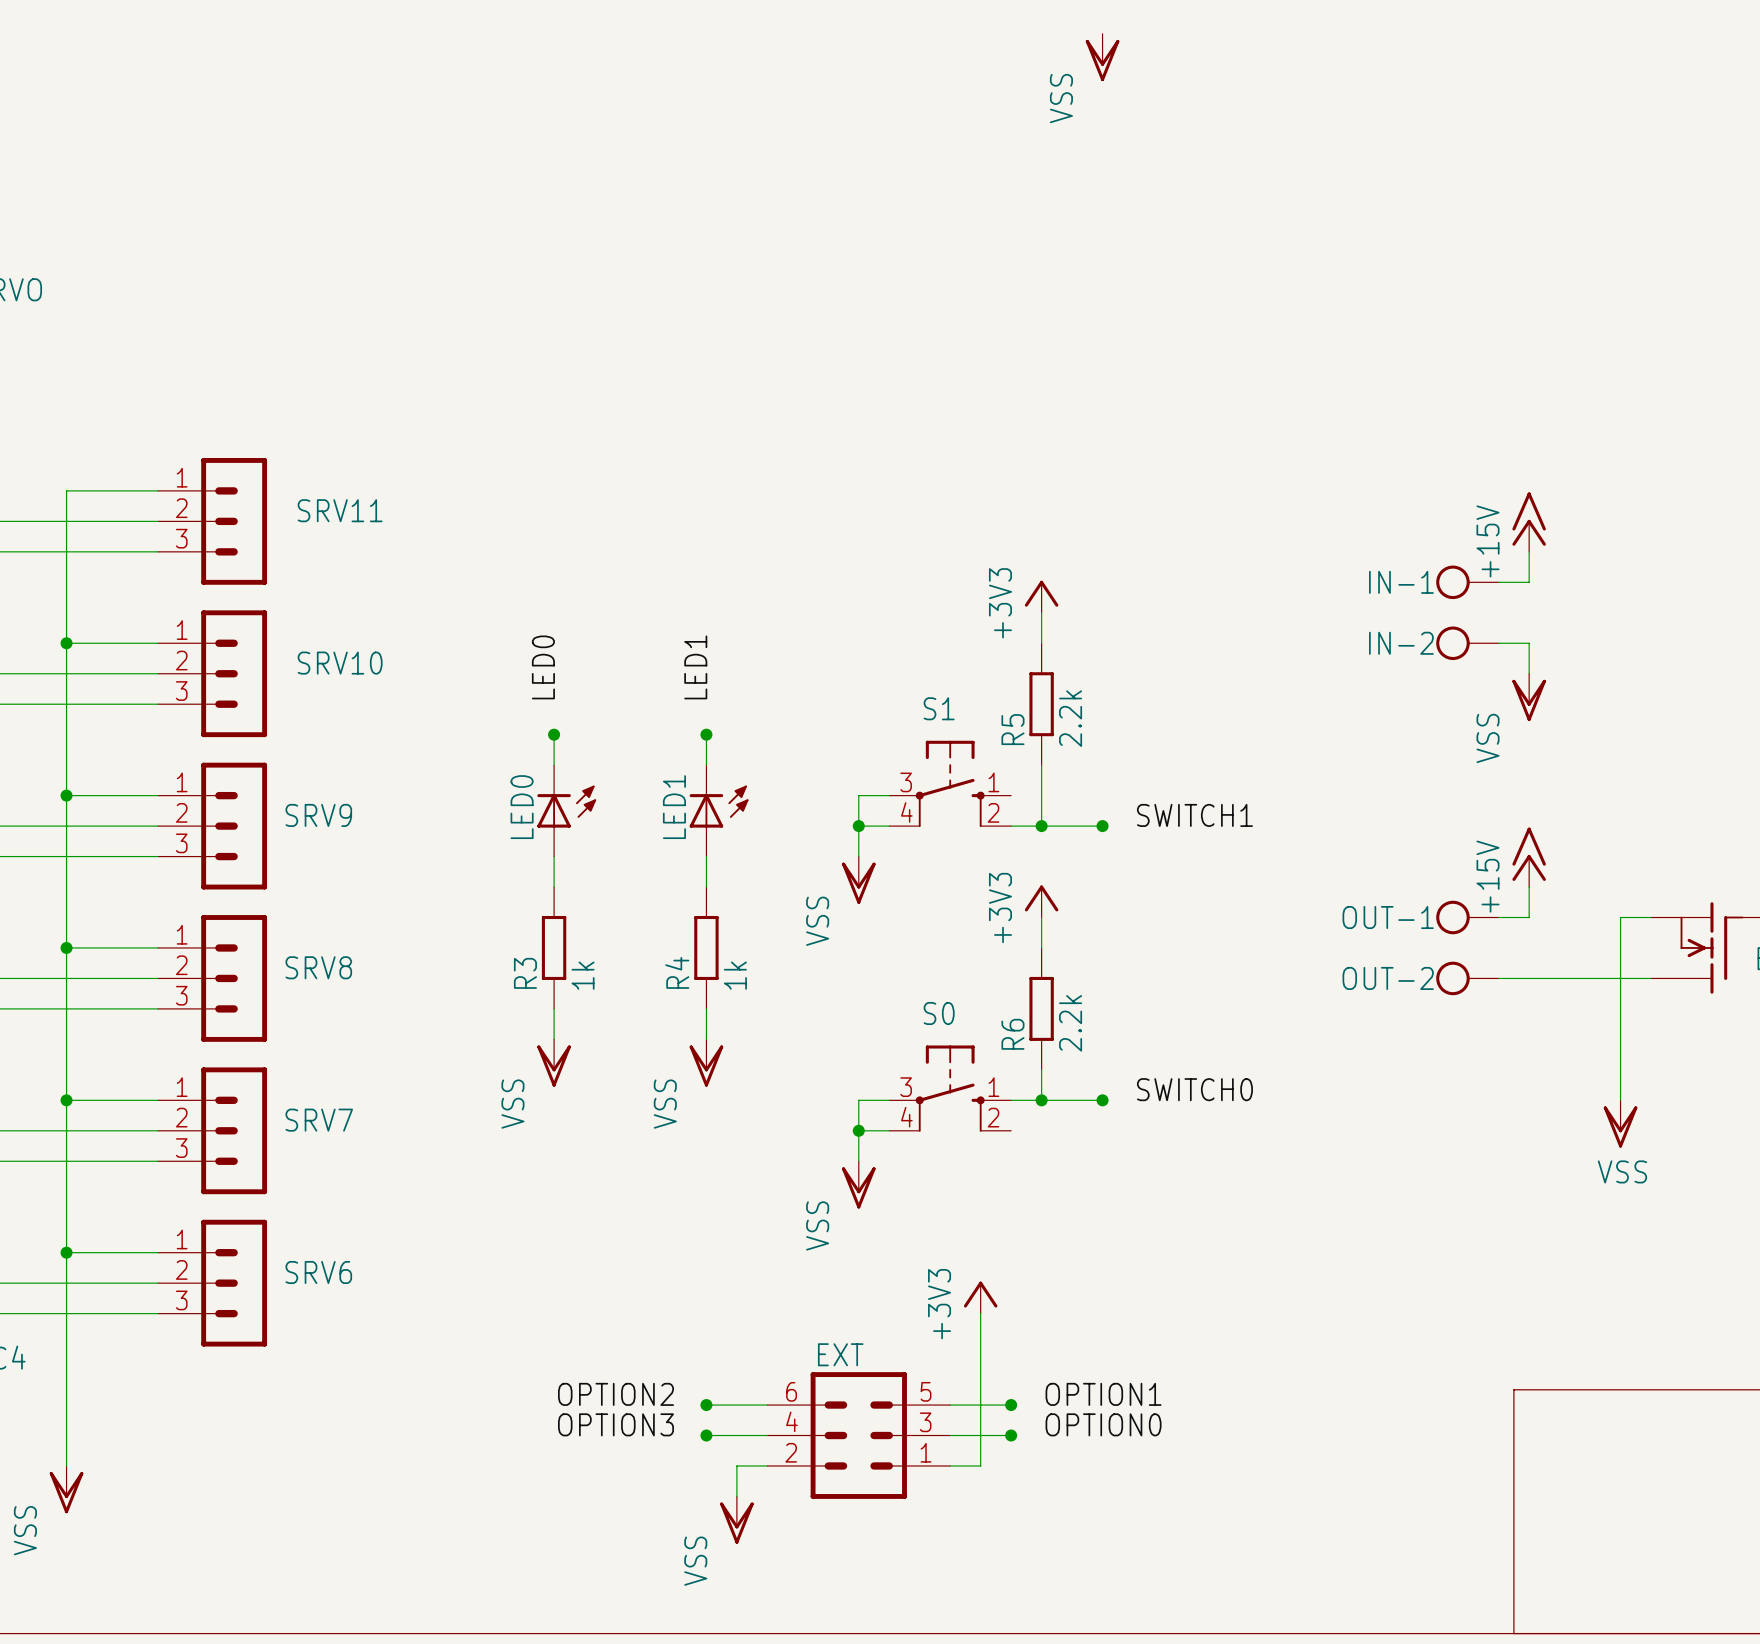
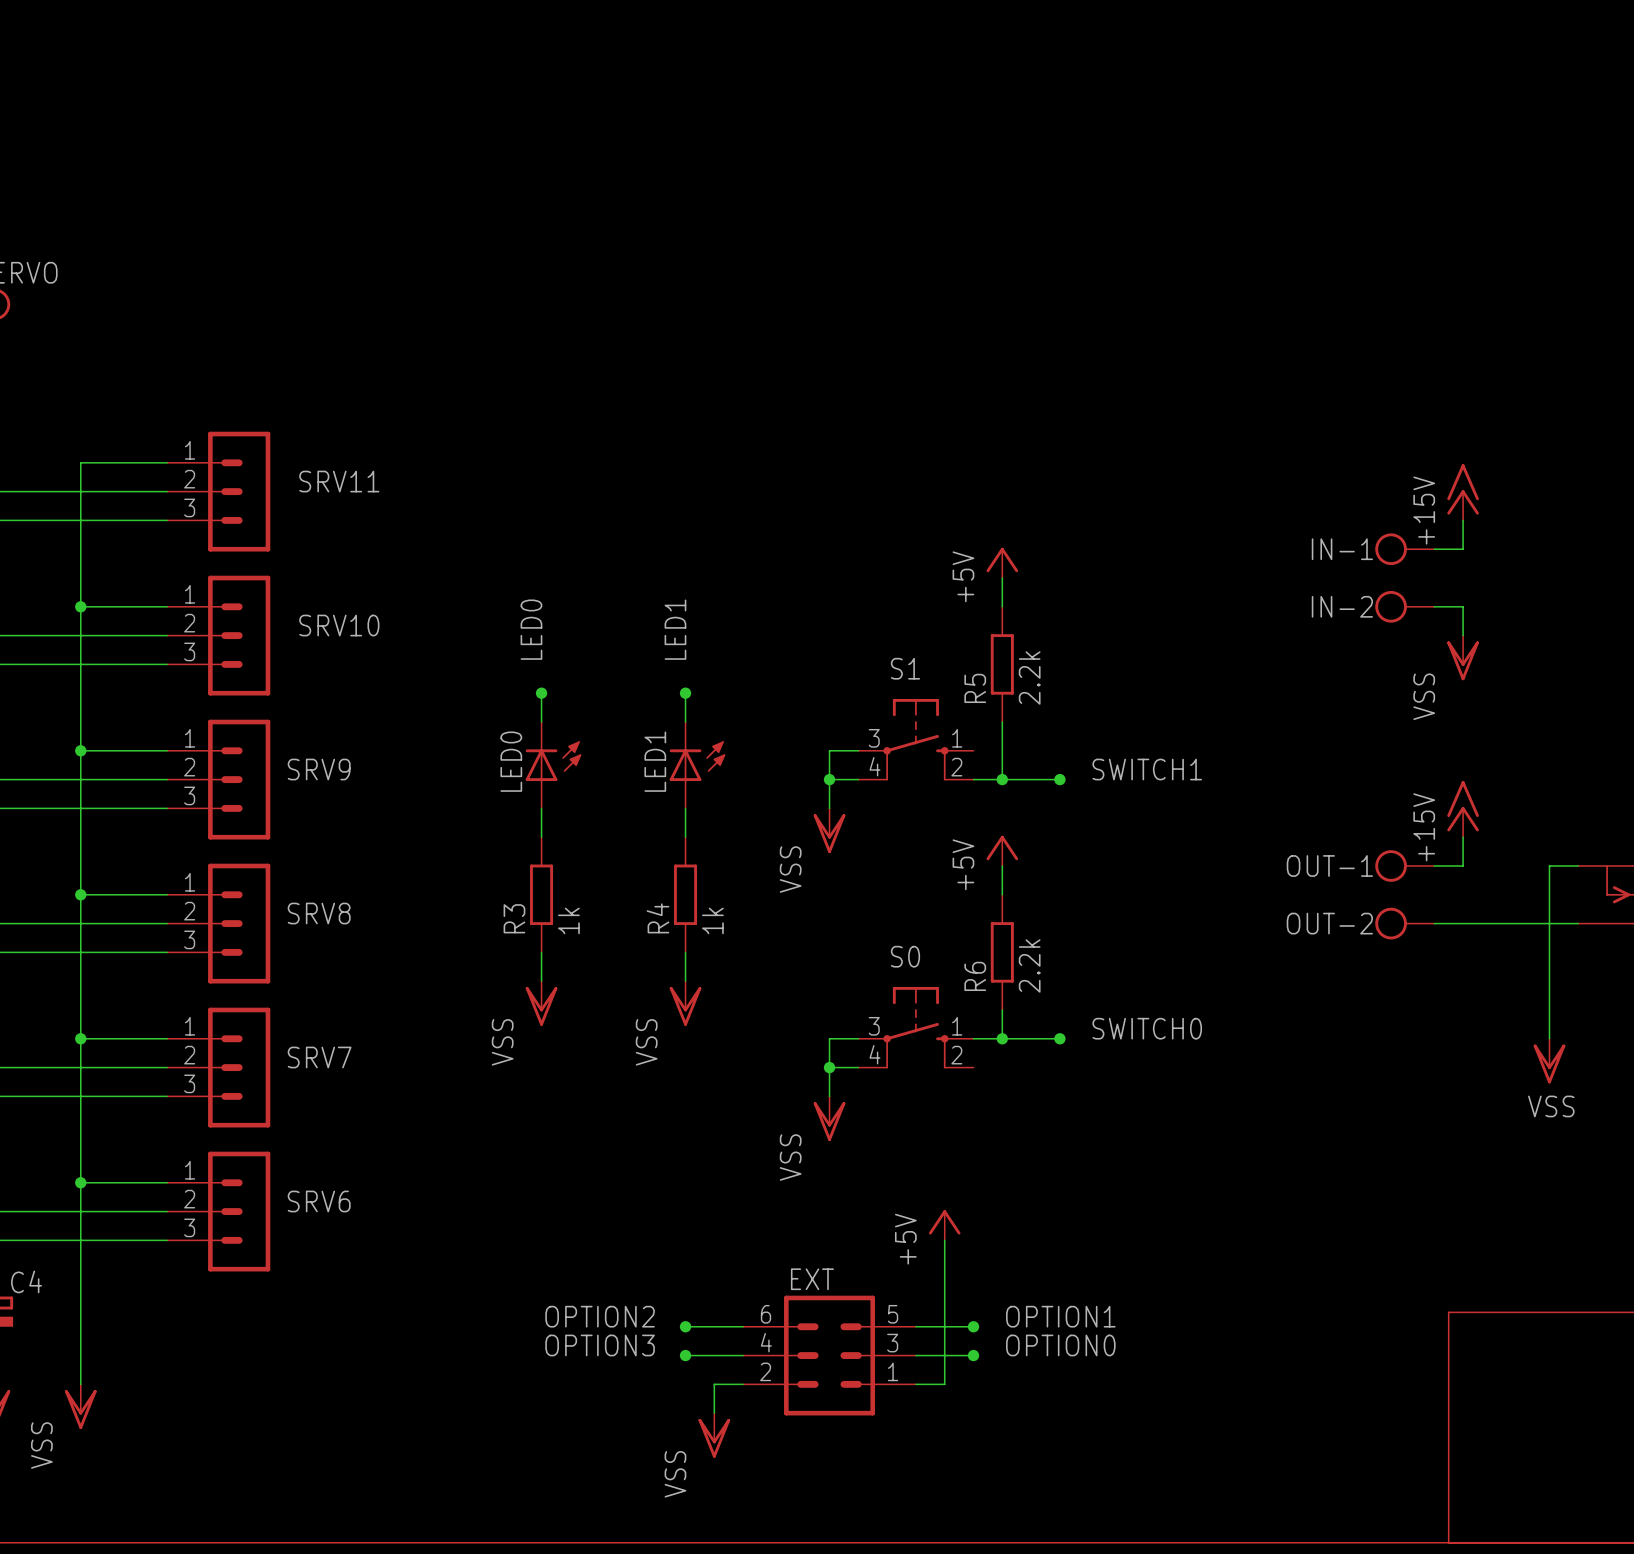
power symbol: VSS (1102, 57) -> none
power symbol: +3V3 (1041, 596) -> +5V (1002, 562)
power symbol: +3V3 (1041, 901) -> +5V (1002, 850)
power symbol: +3V3 (980, 1297) -> +5V (944, 1225)

